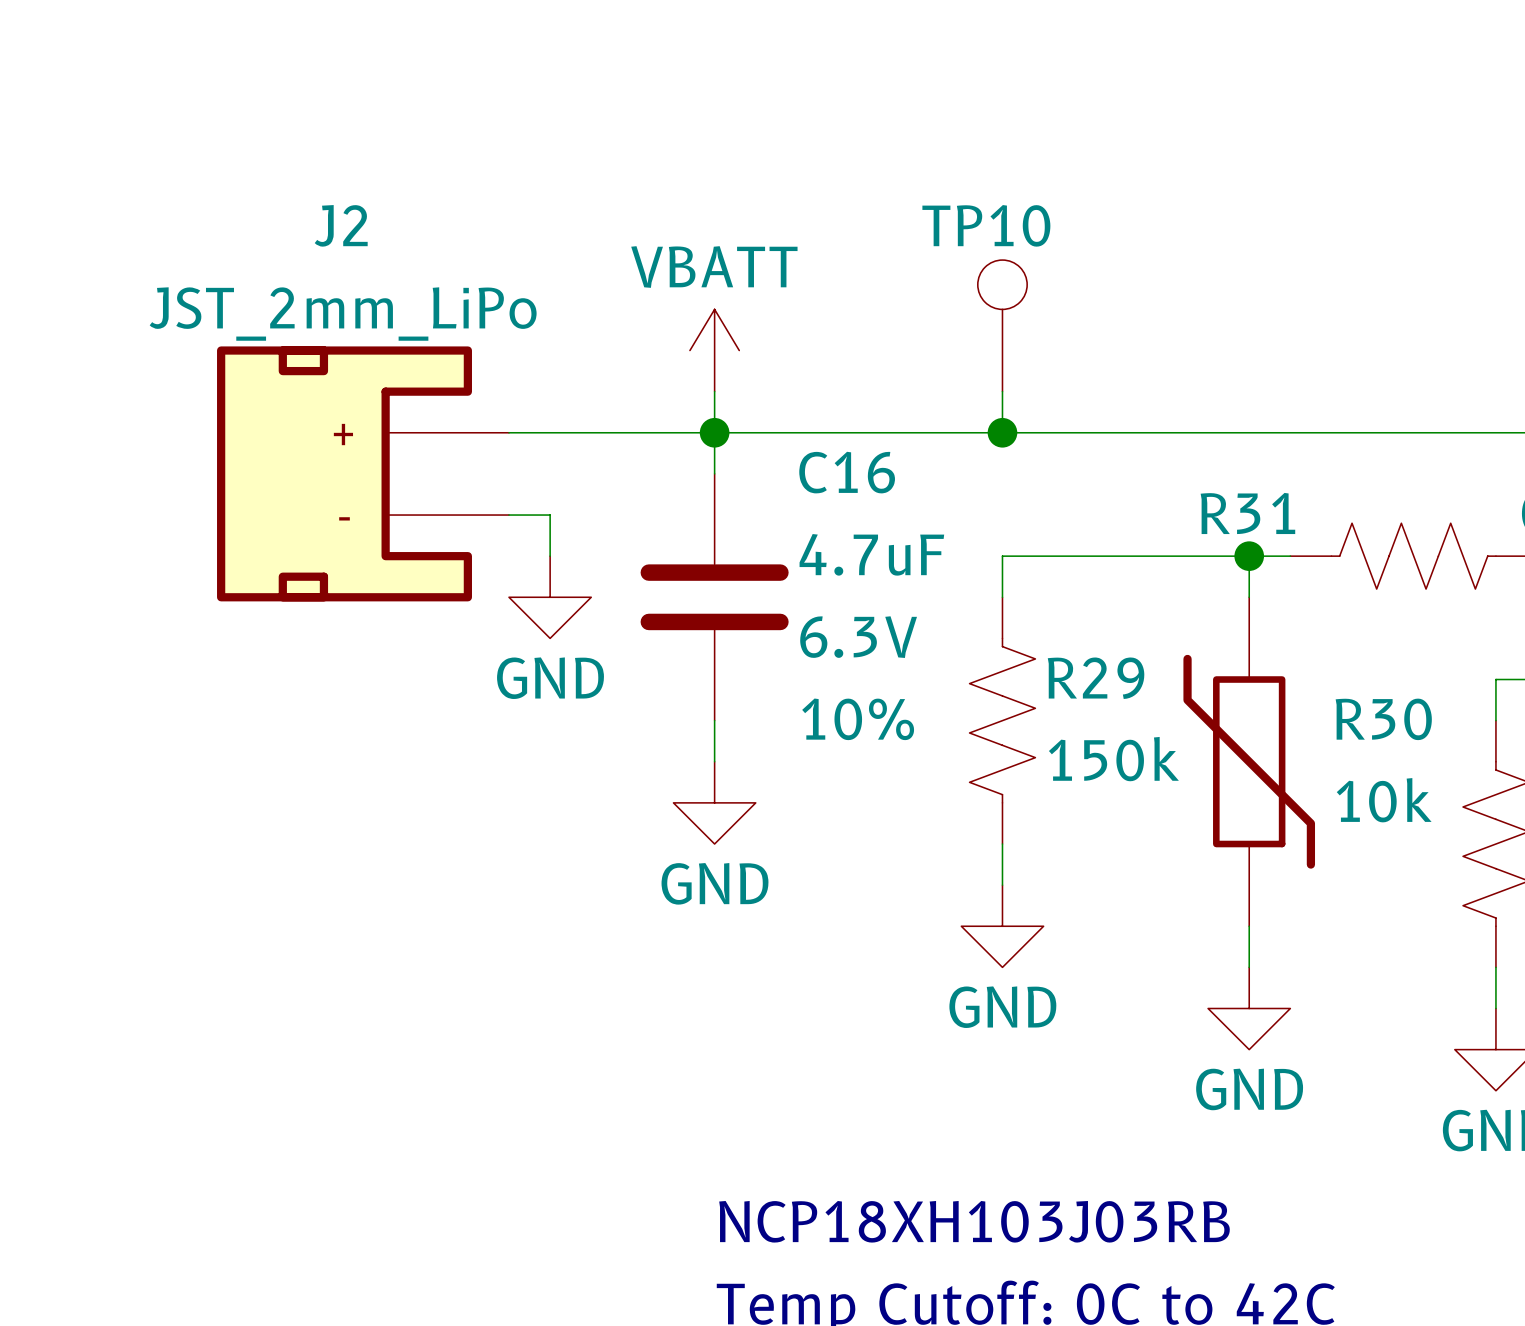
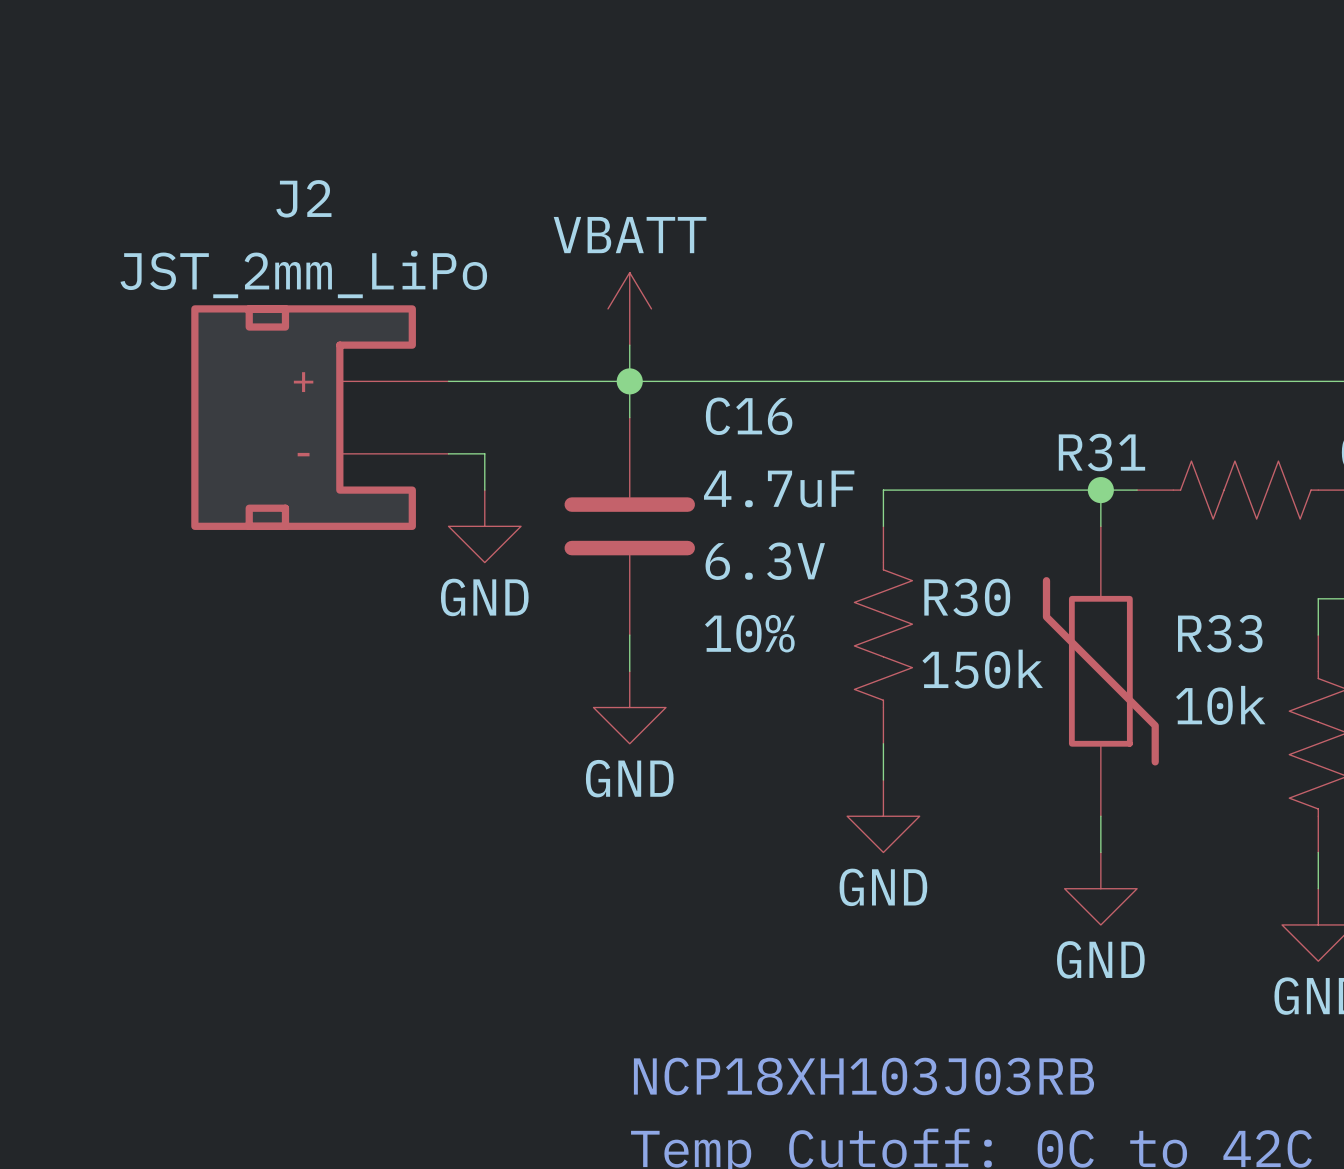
TP10: (1002, 325) -> none
wire: (1002, 391) (1002, 432) -> none
junction: (1002, 432) -> none
R29 name: R29 (1096, 678) -> R30 (967, 597)
R30 name: R30 (1383, 719) -> R33 (1220, 633)

